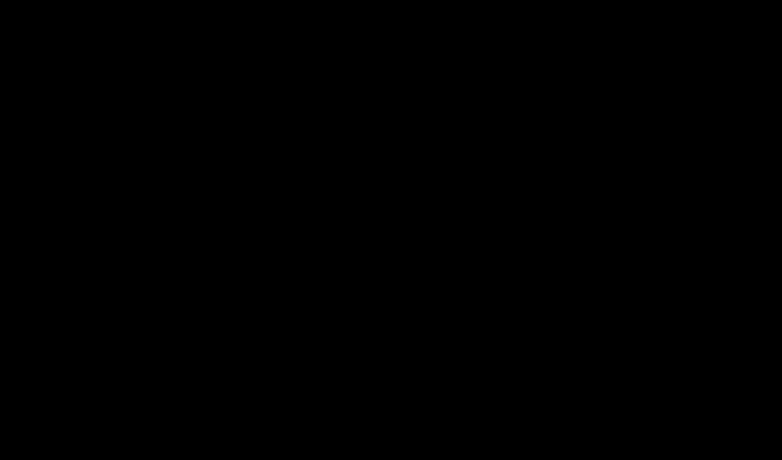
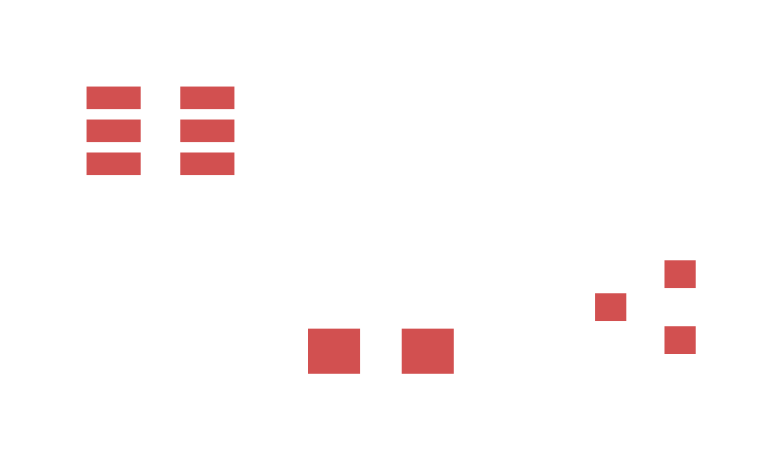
part: none -> (160, 130)
part: none -> (645, 307)
part: none -> (380, 351)

